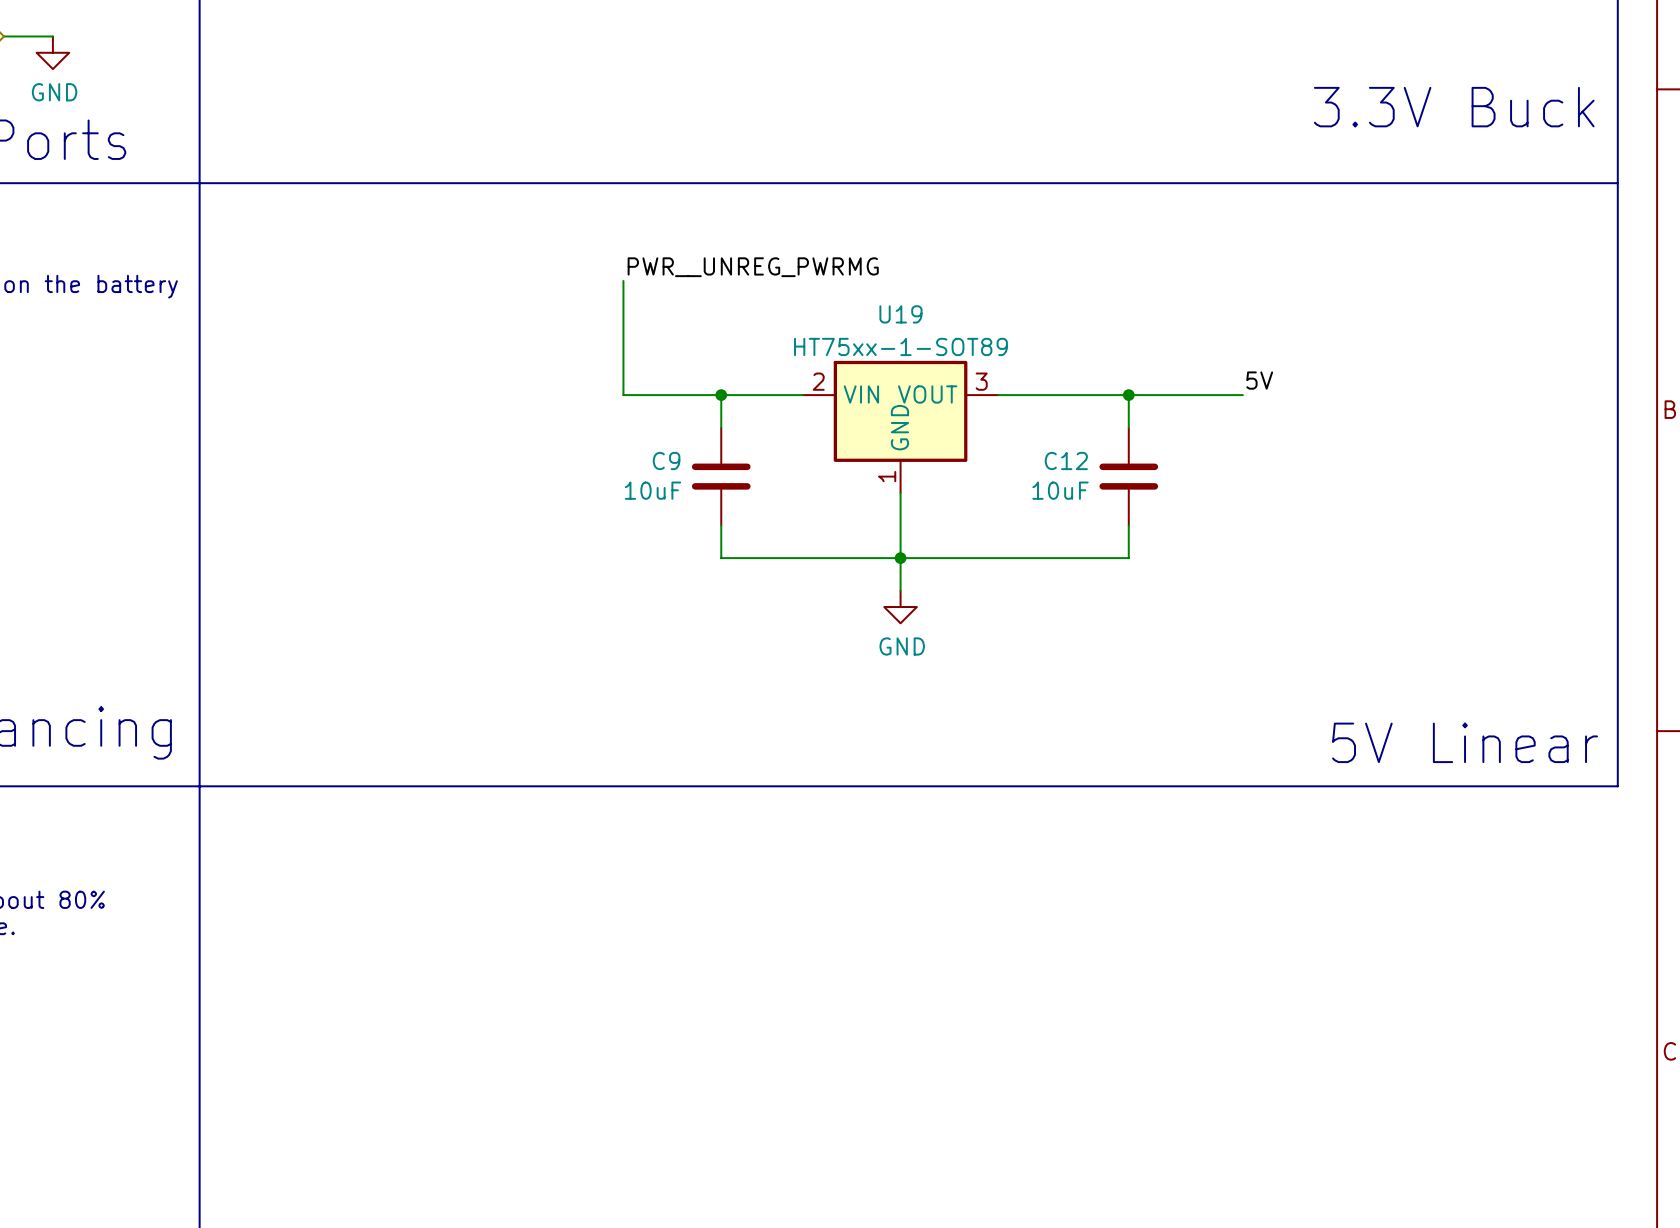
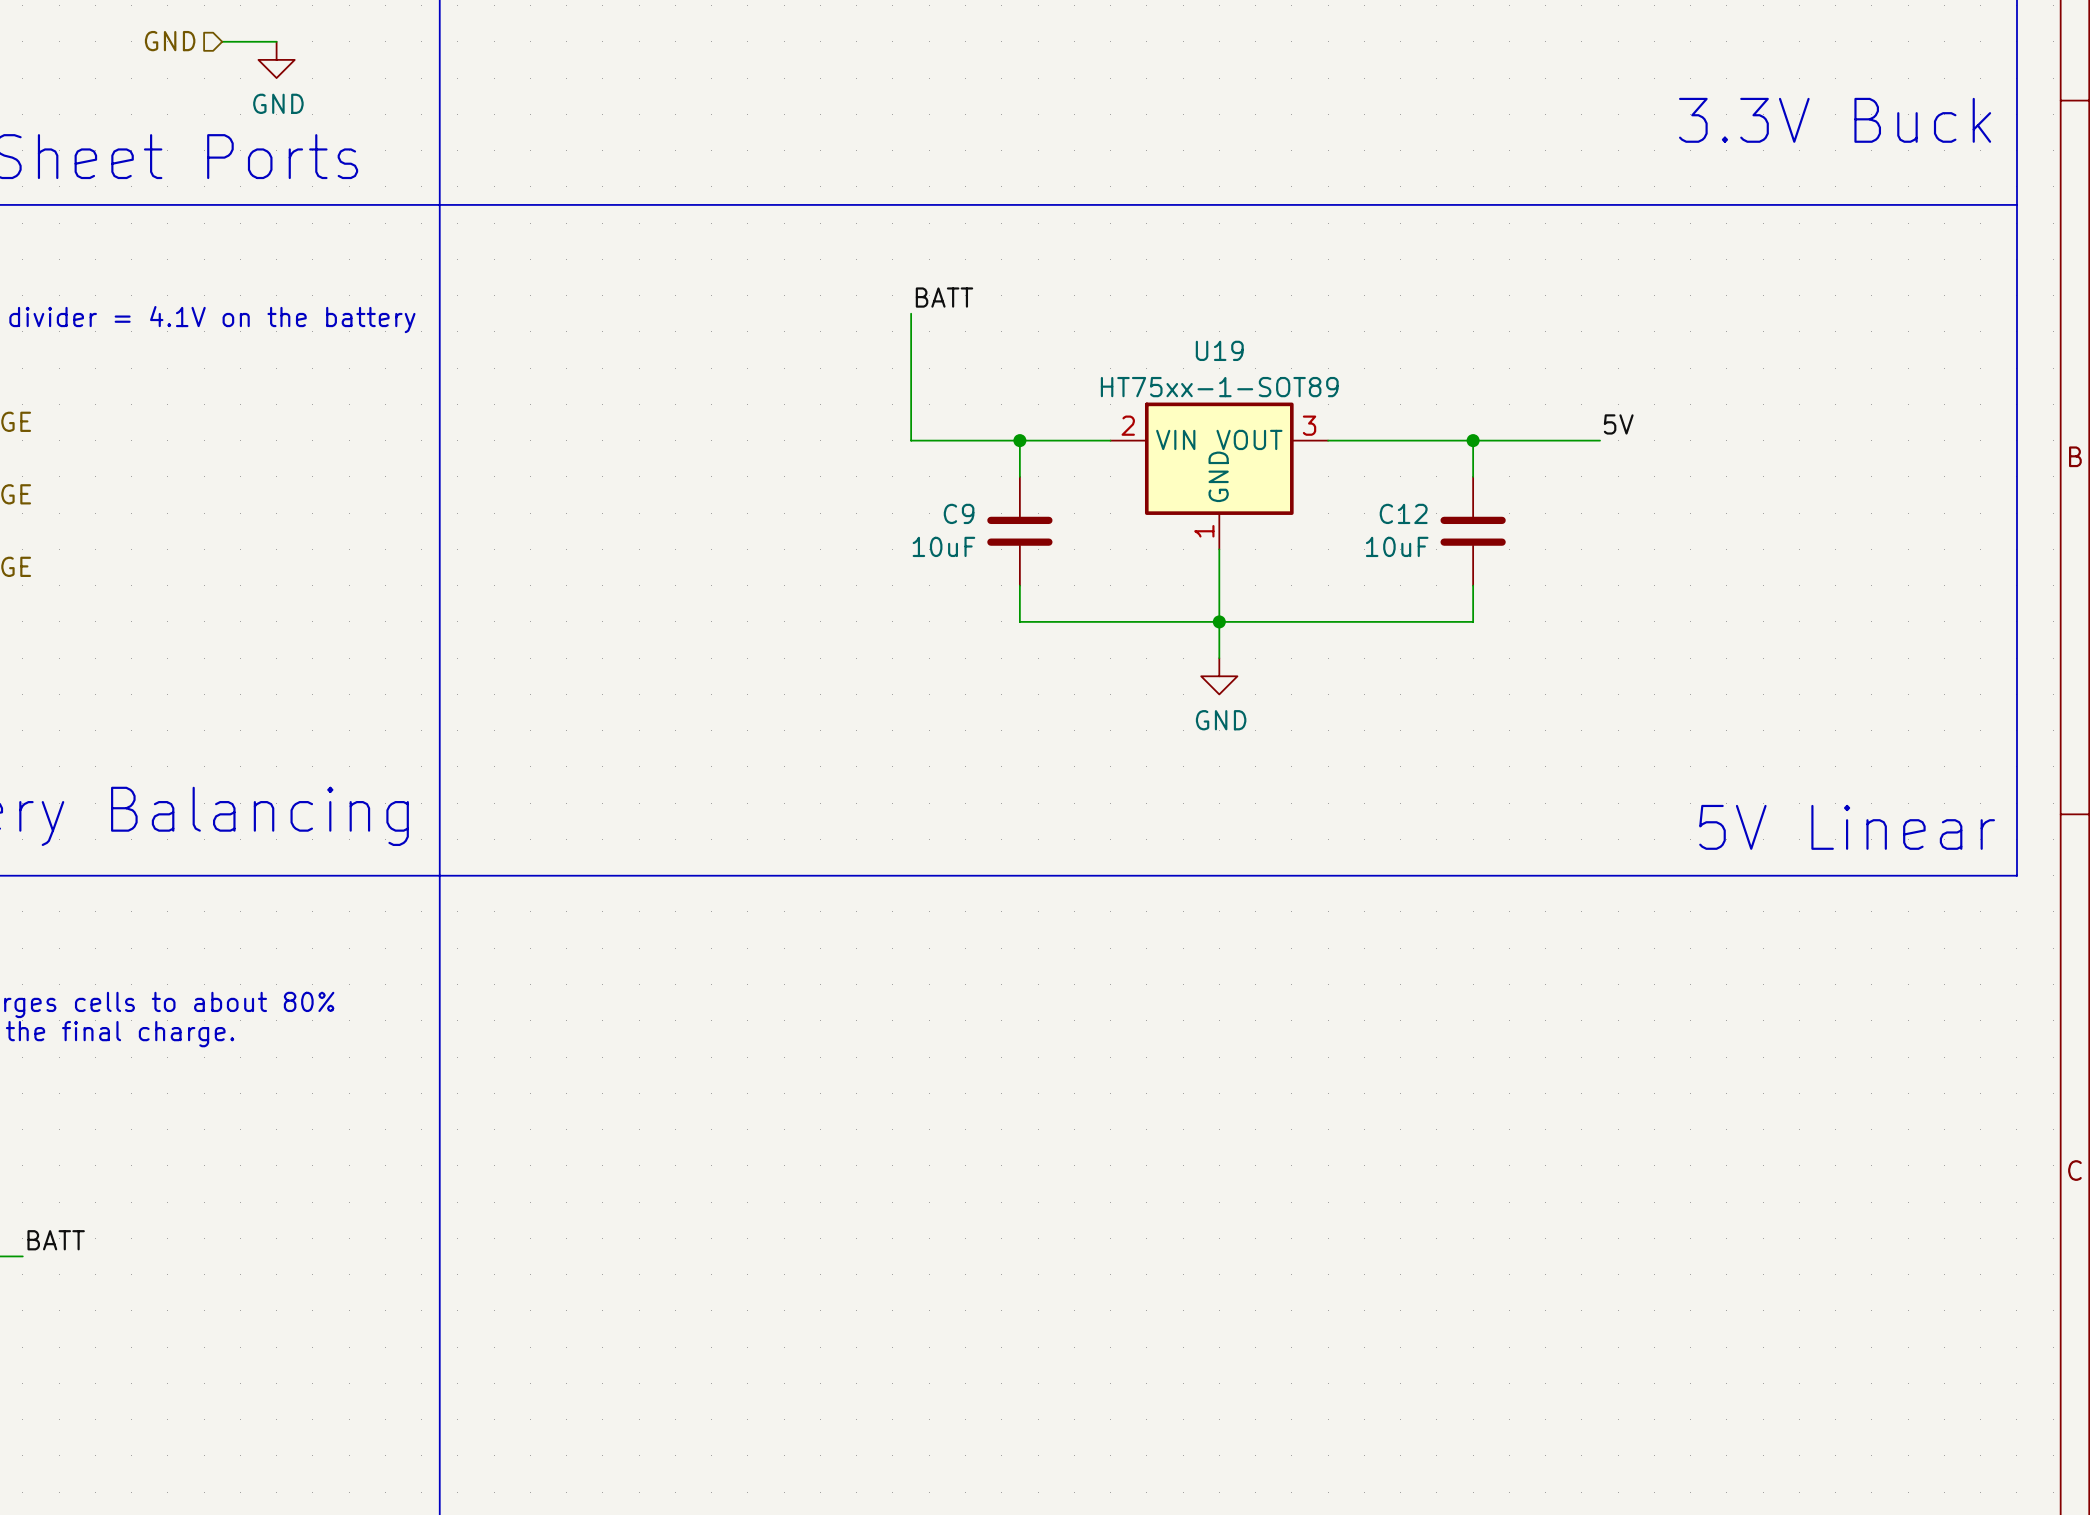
label: PWR__UNREG_PWRMG (753, 267) -> BATT (944, 297)

